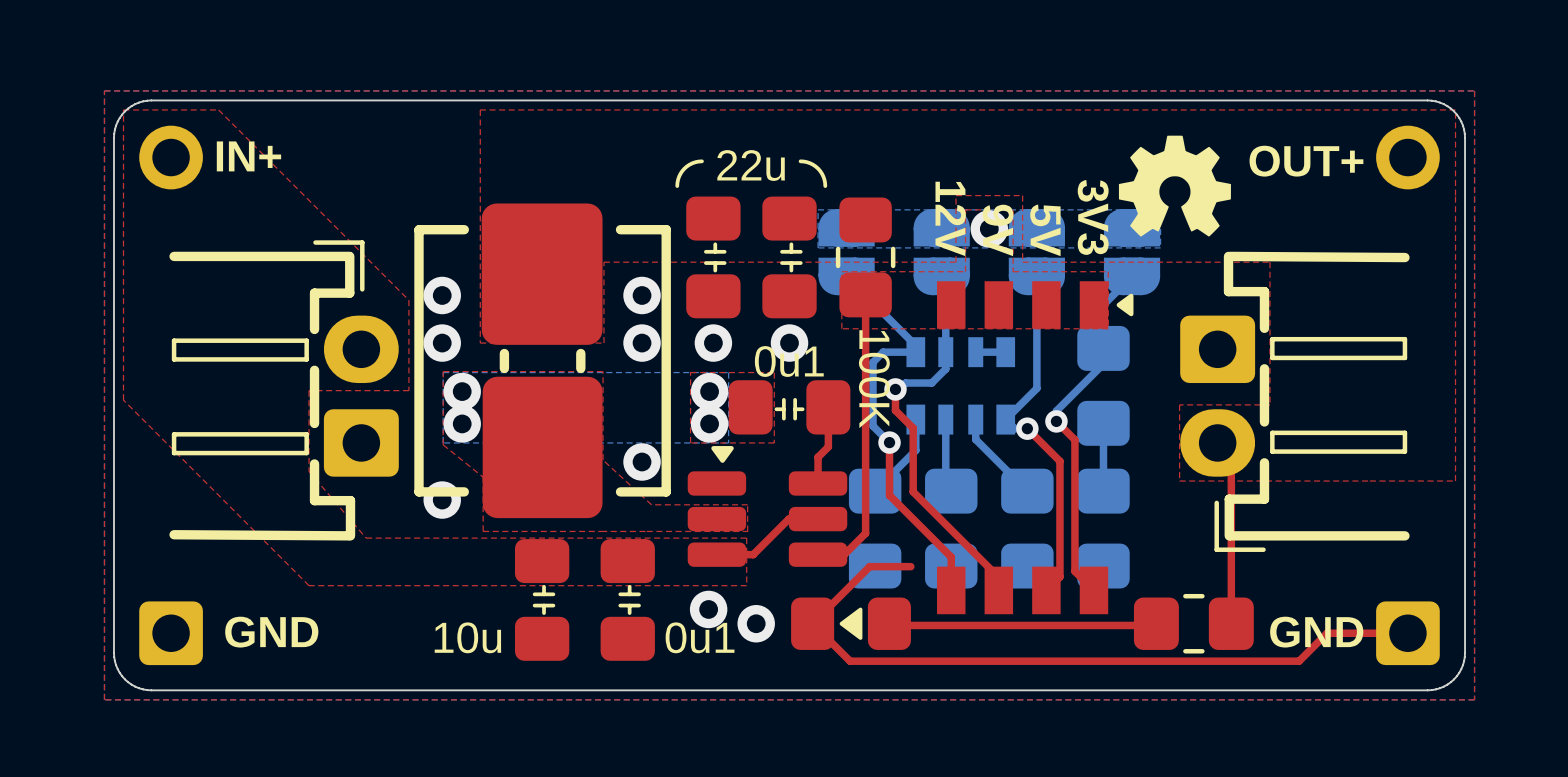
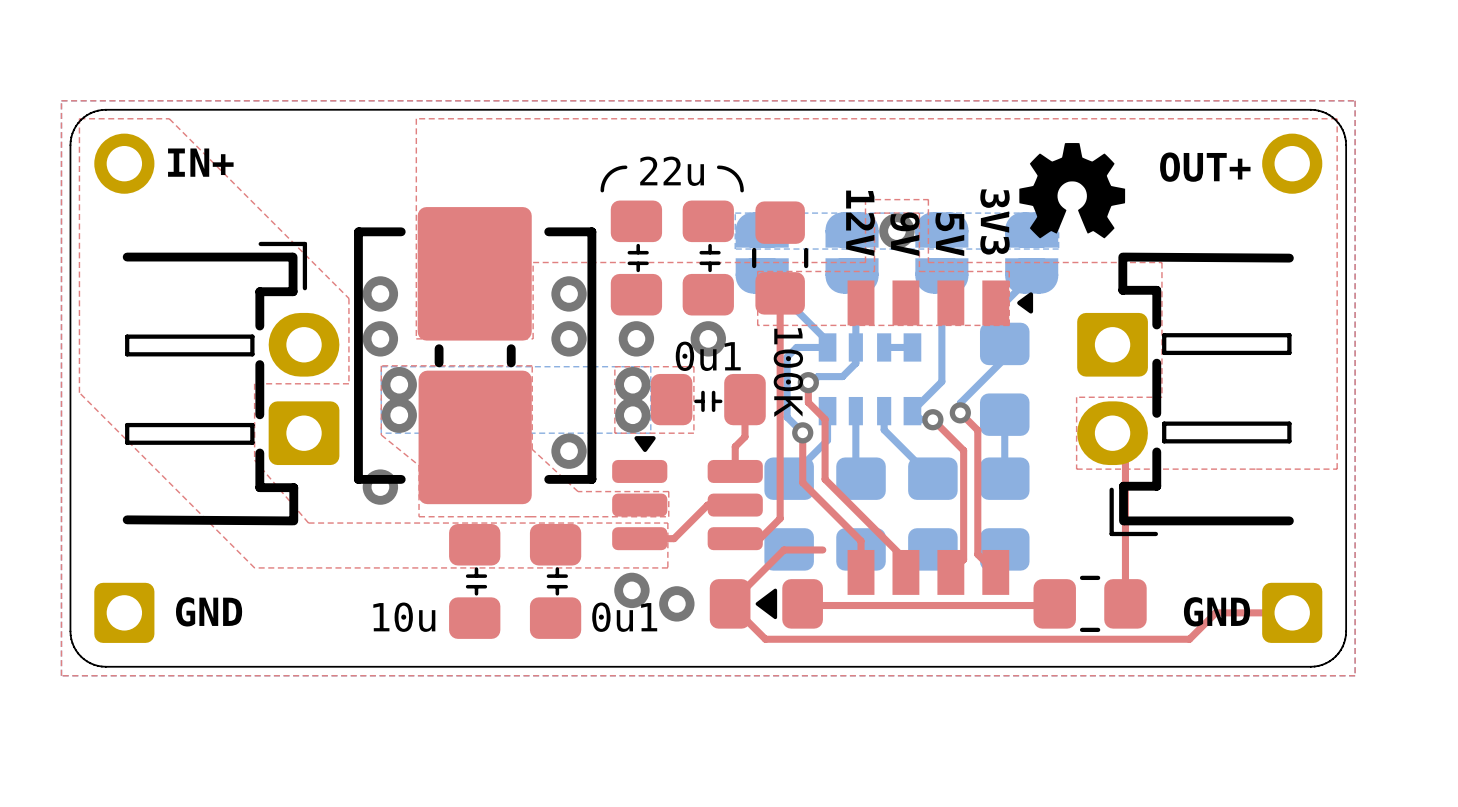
part footprint: [414, 203, 671, 519] -> [354, 207, 597, 505]

